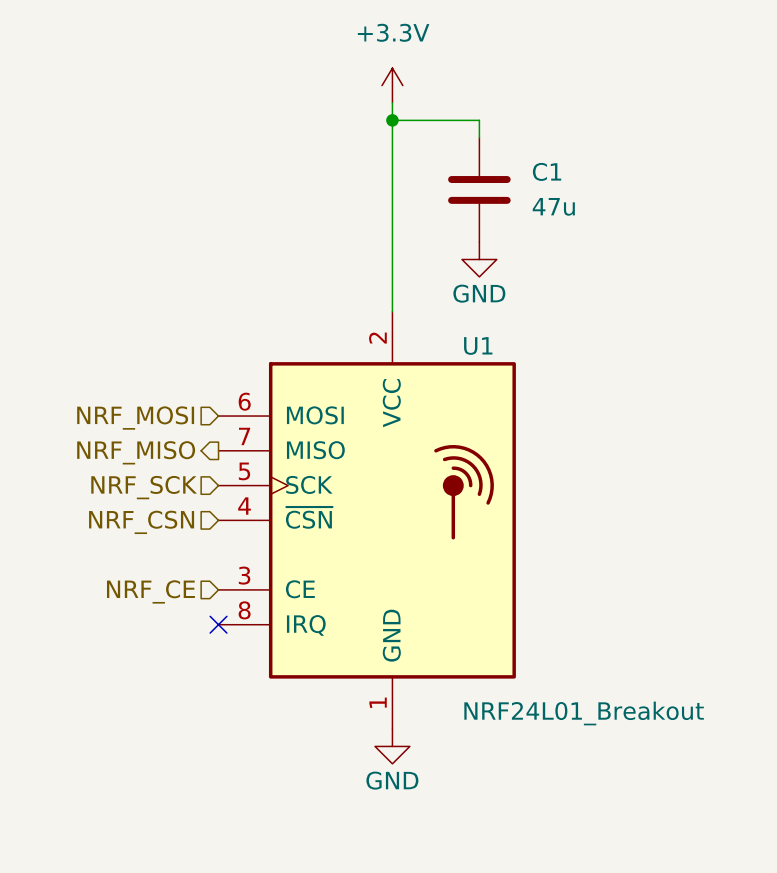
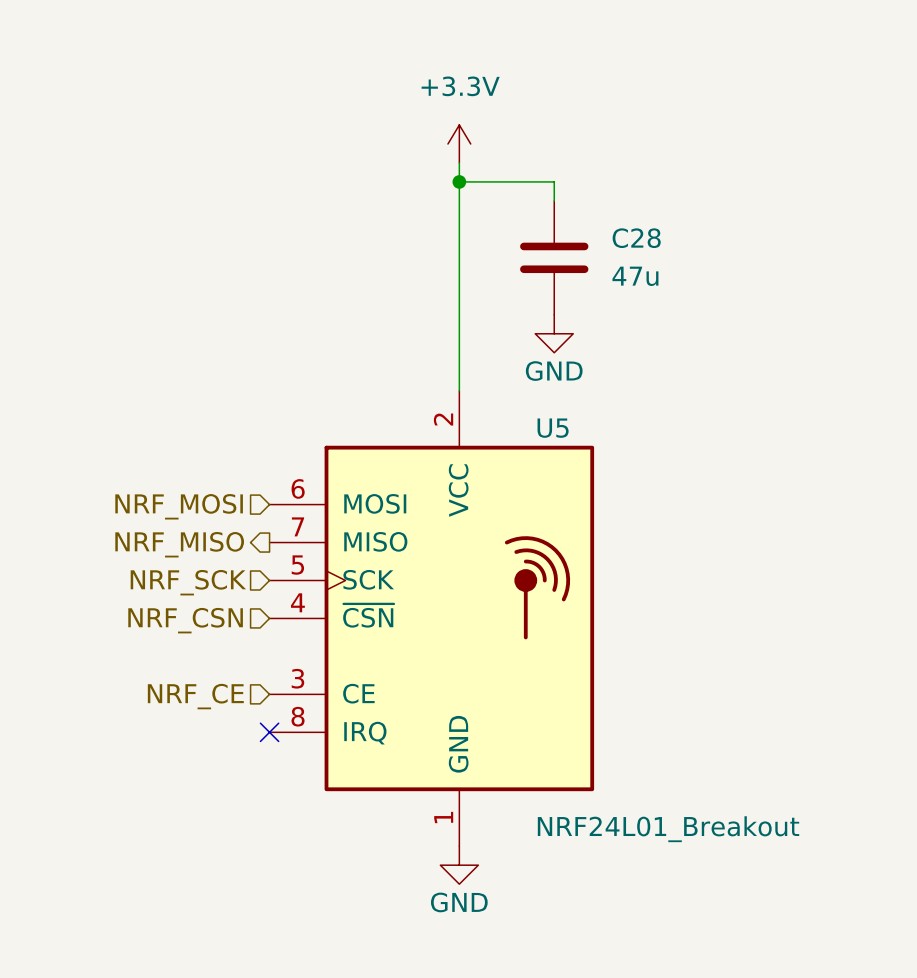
C1 name: C1 (547, 171) -> C28 (636, 238)
U1 name: U1 (478, 345) -> U5 (553, 428)

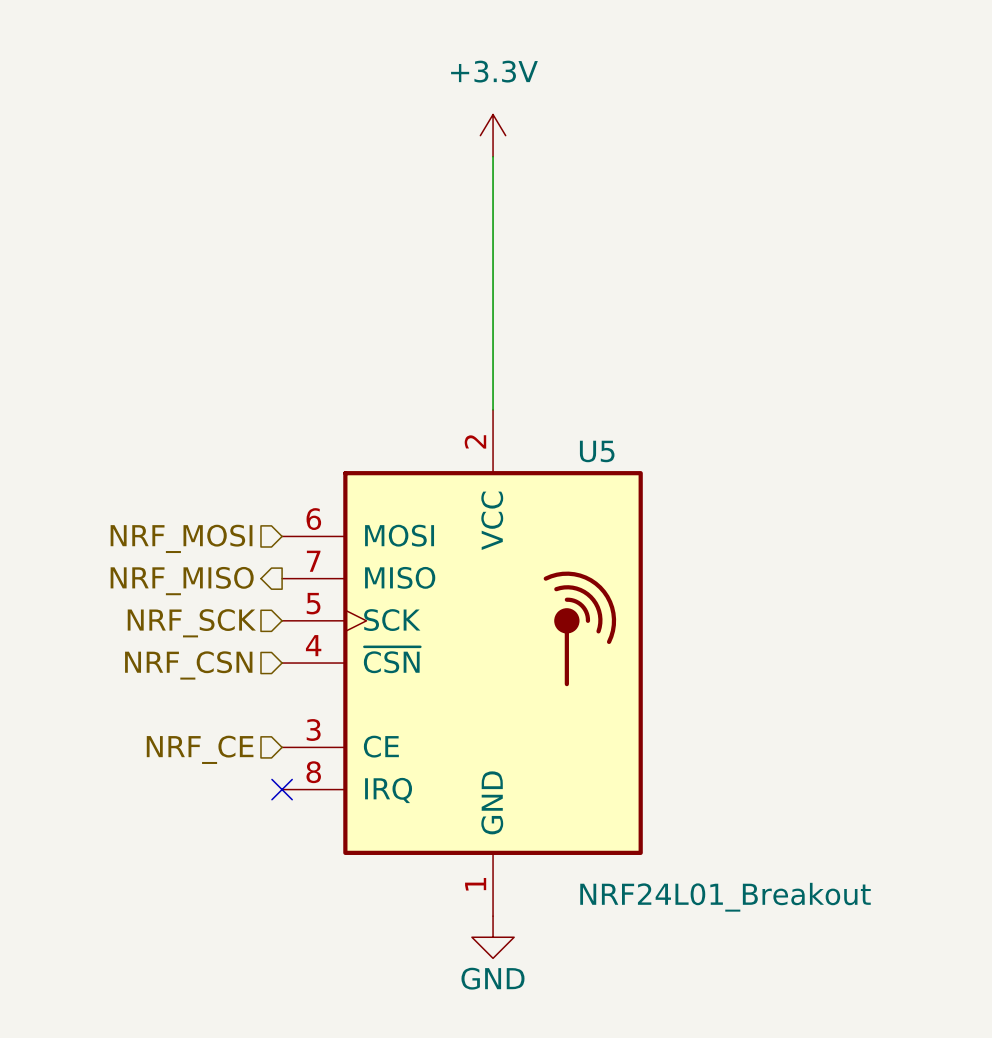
wire: (459, 181) (554, 181) (554, 200) -> none
junction: (459, 181) -> none
C28: 47u (554, 257) -> none
power symbol: GND (554, 333) -> none

